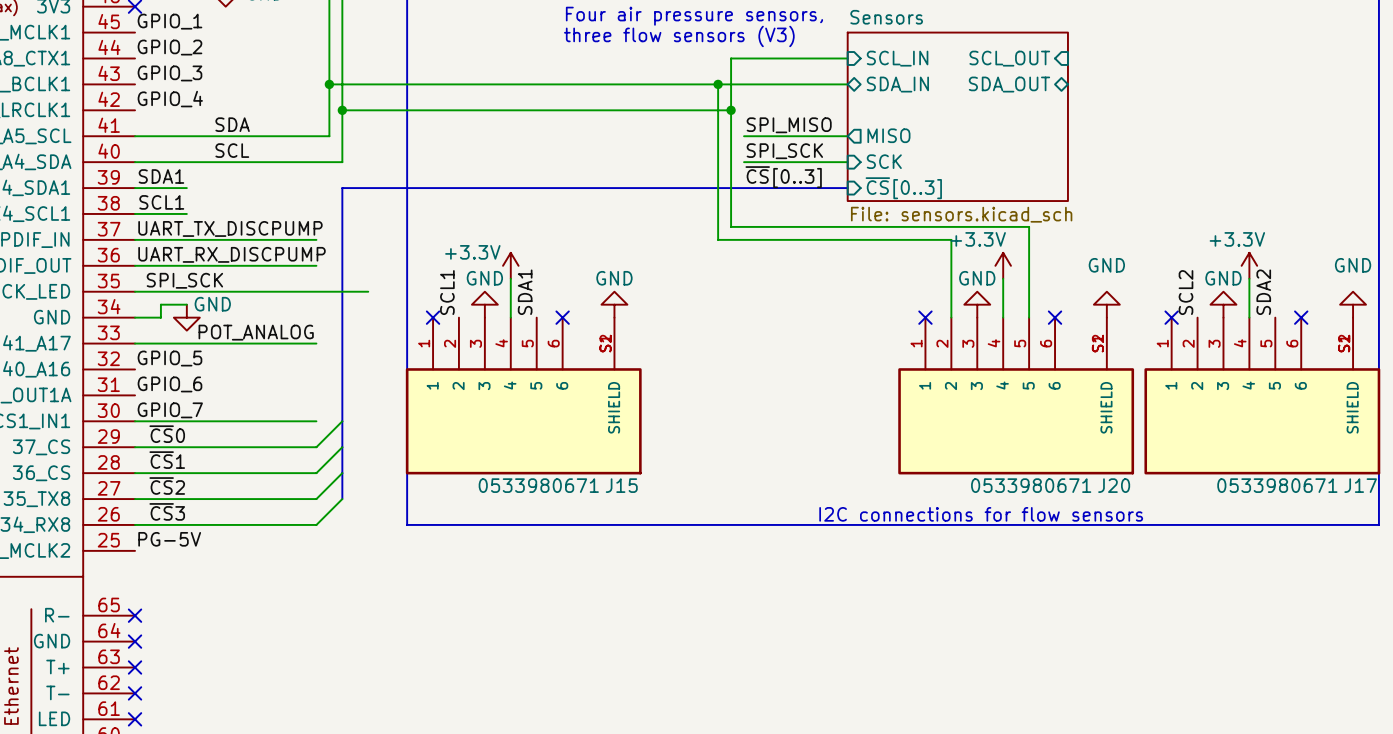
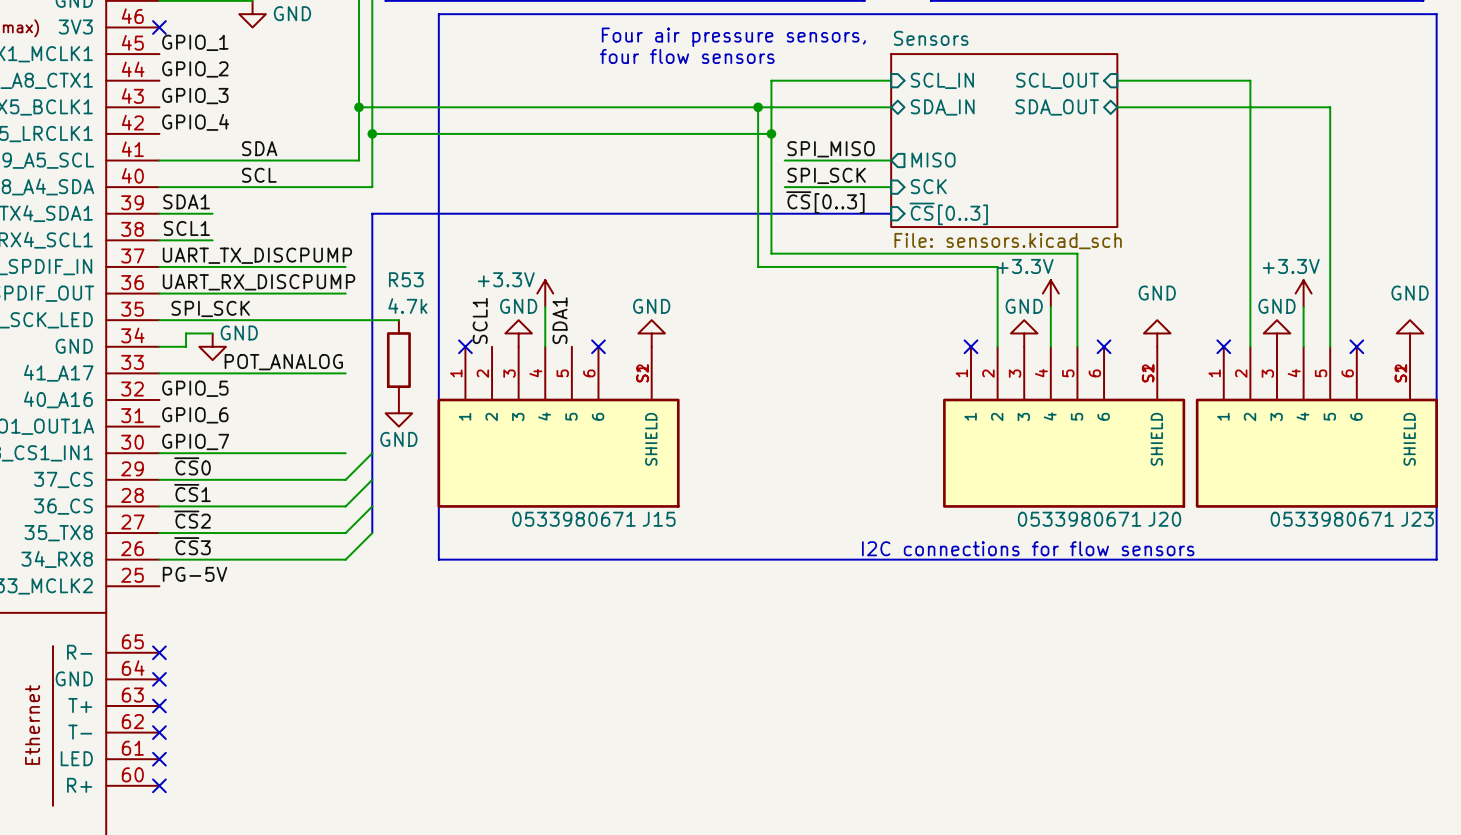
text: three flow sensors (V3) (679, 36) -> four flow sensors (687, 56)
wire: none -> (1117, 80) (1250, 80) (1250, 346)
wire: none -> (1117, 107) (1330, 107) (1330, 346)
label: SCL2 (1185, 292) -> none
label: SDA2 (1263, 292) -> none
R53: none -> 4.7k (398, 360)
power symbol: none -> GND (398, 413)
J17 name: J17 (1360, 485) -> J23 (1417, 519)

